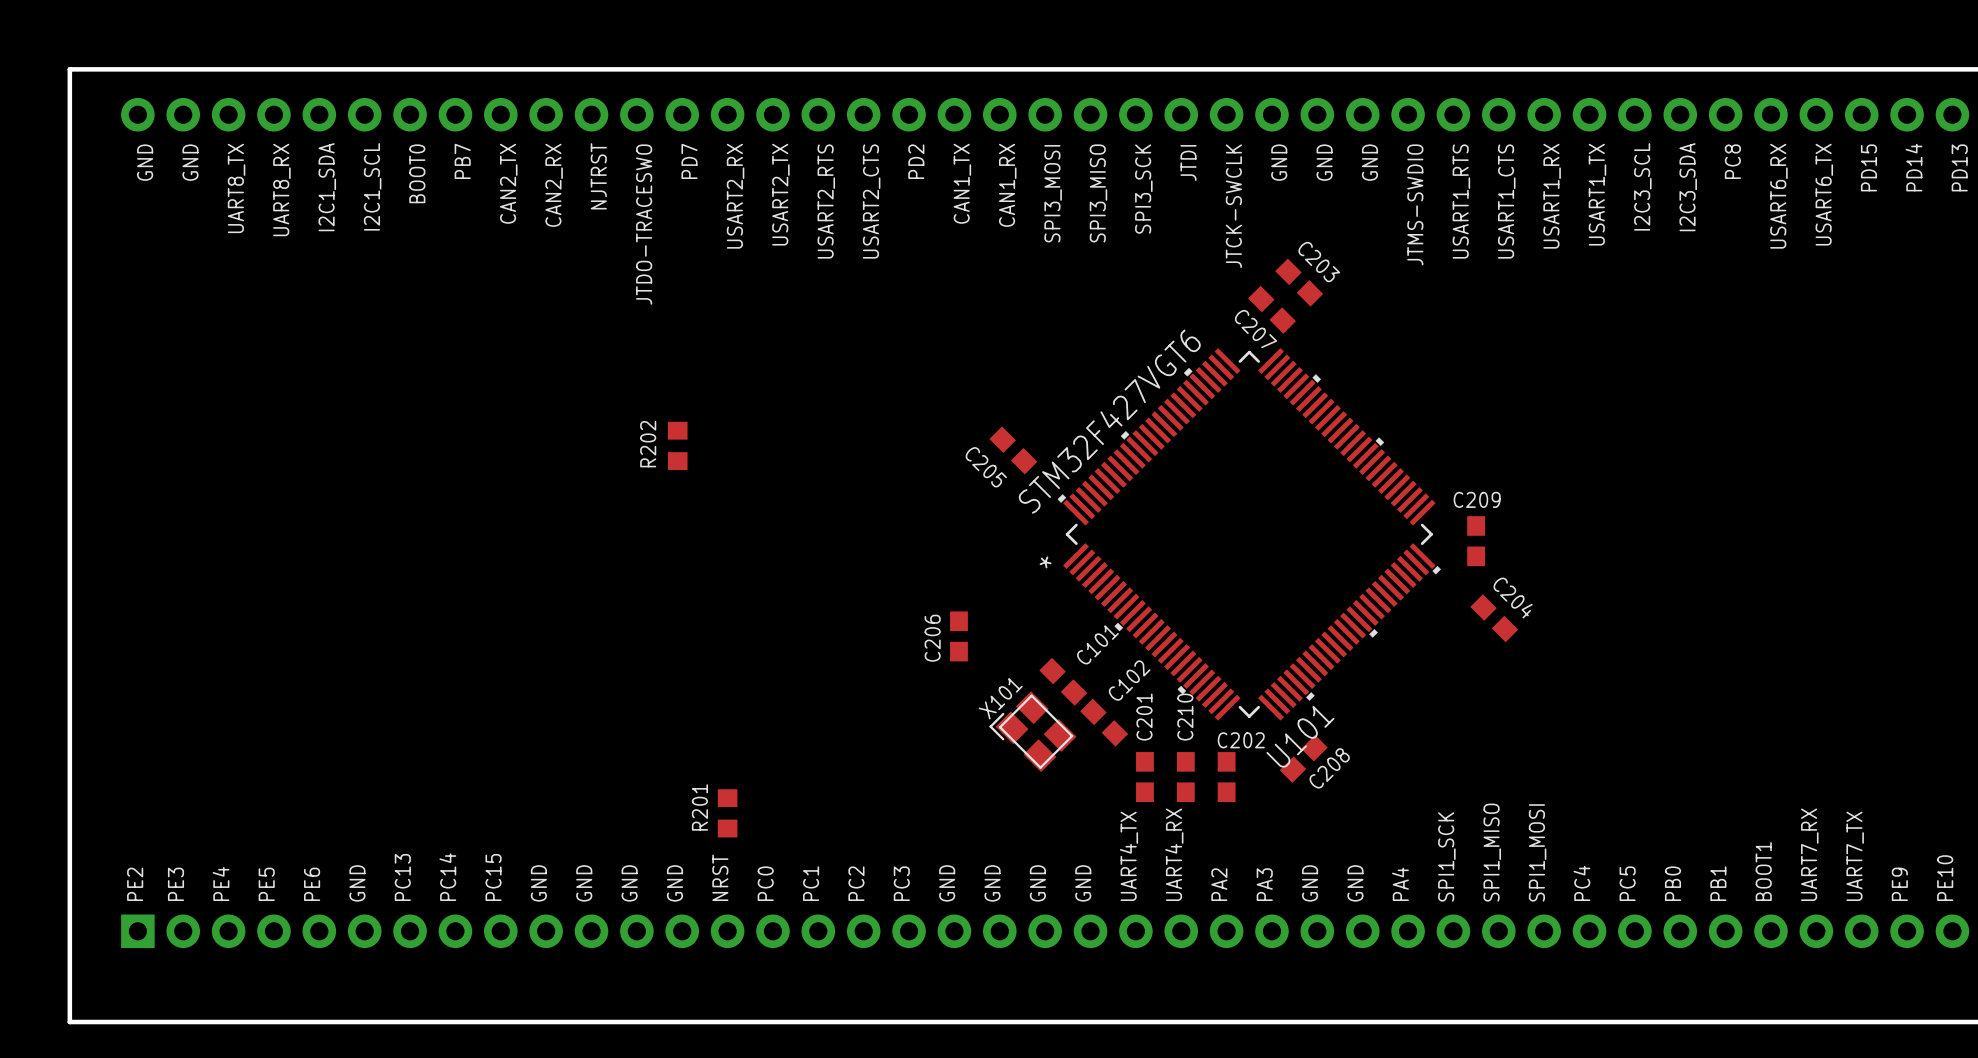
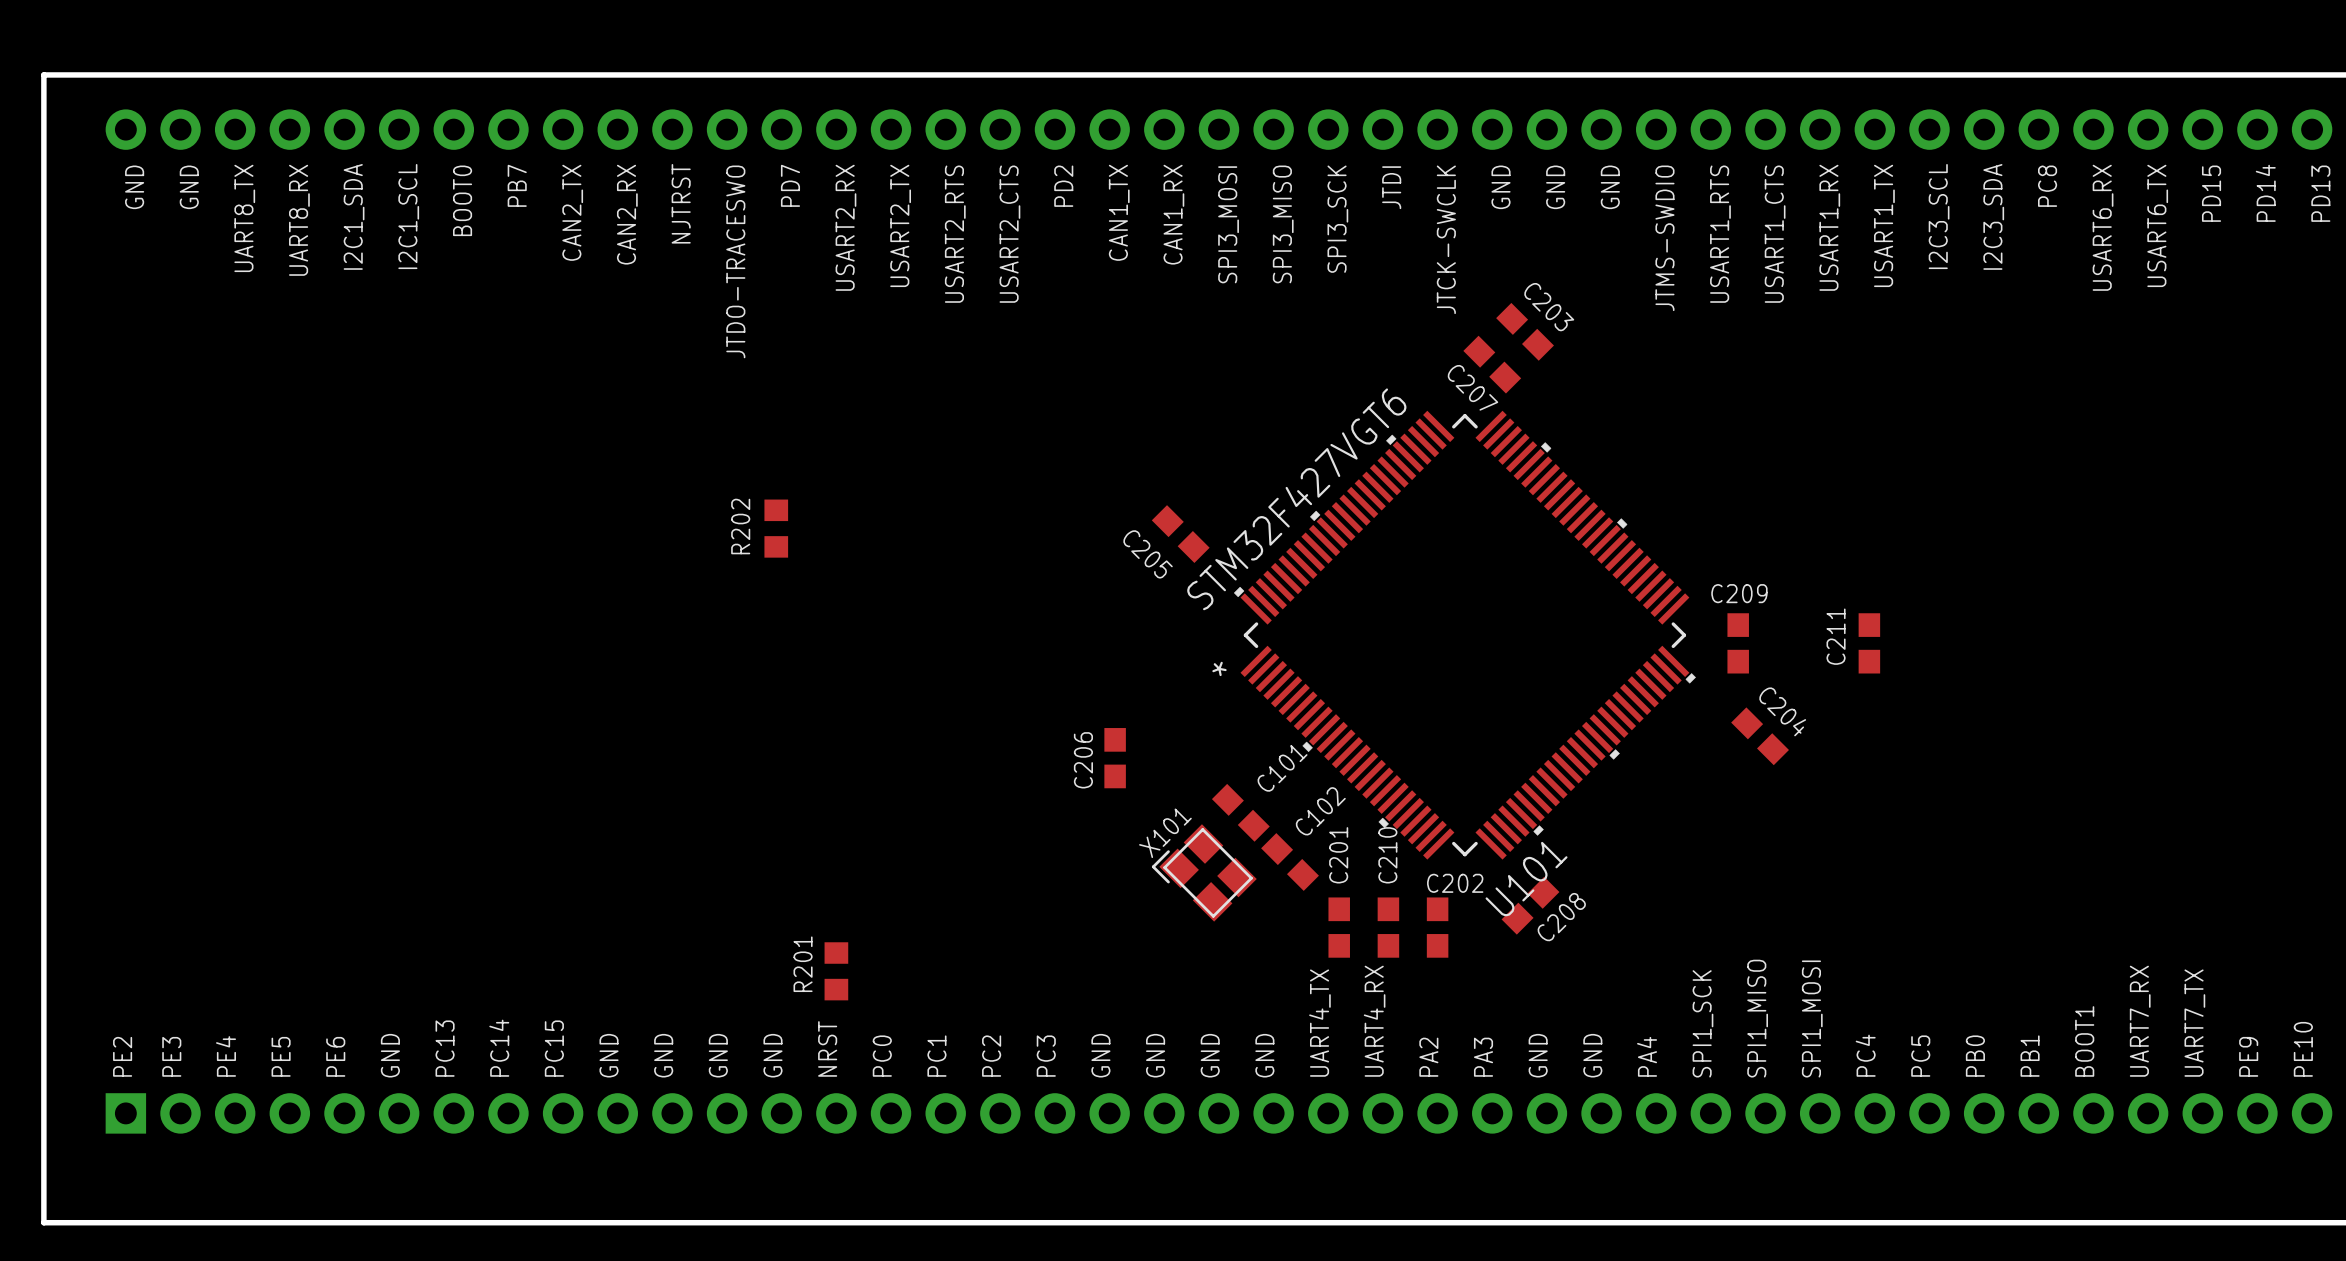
C211: none -> (1869, 643)

